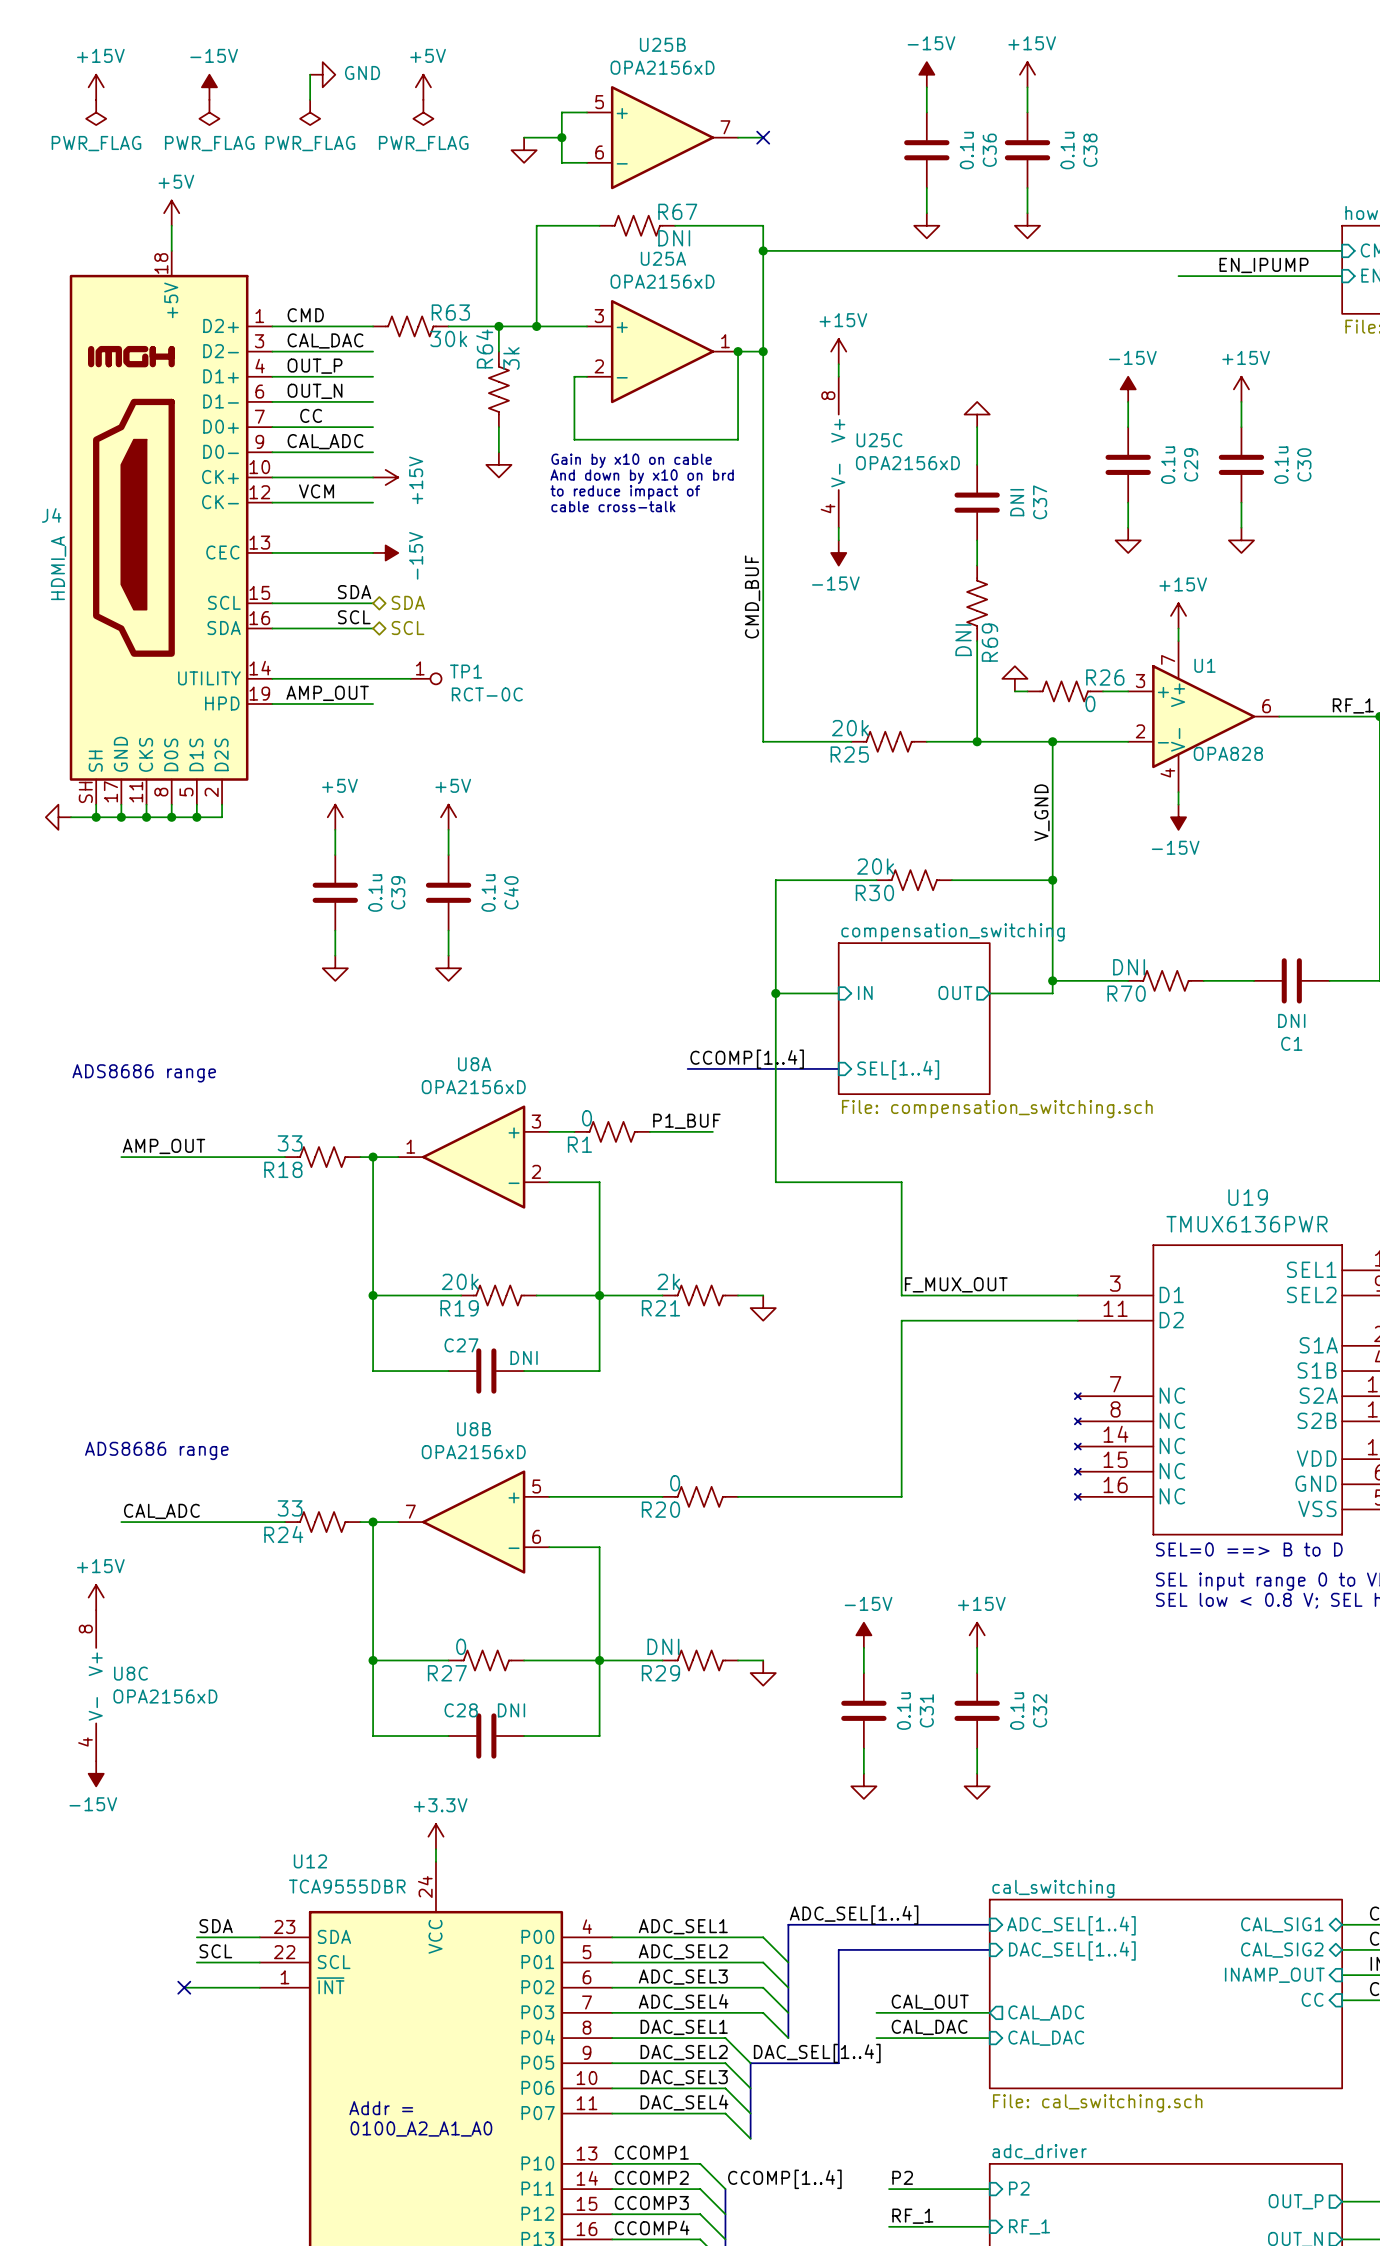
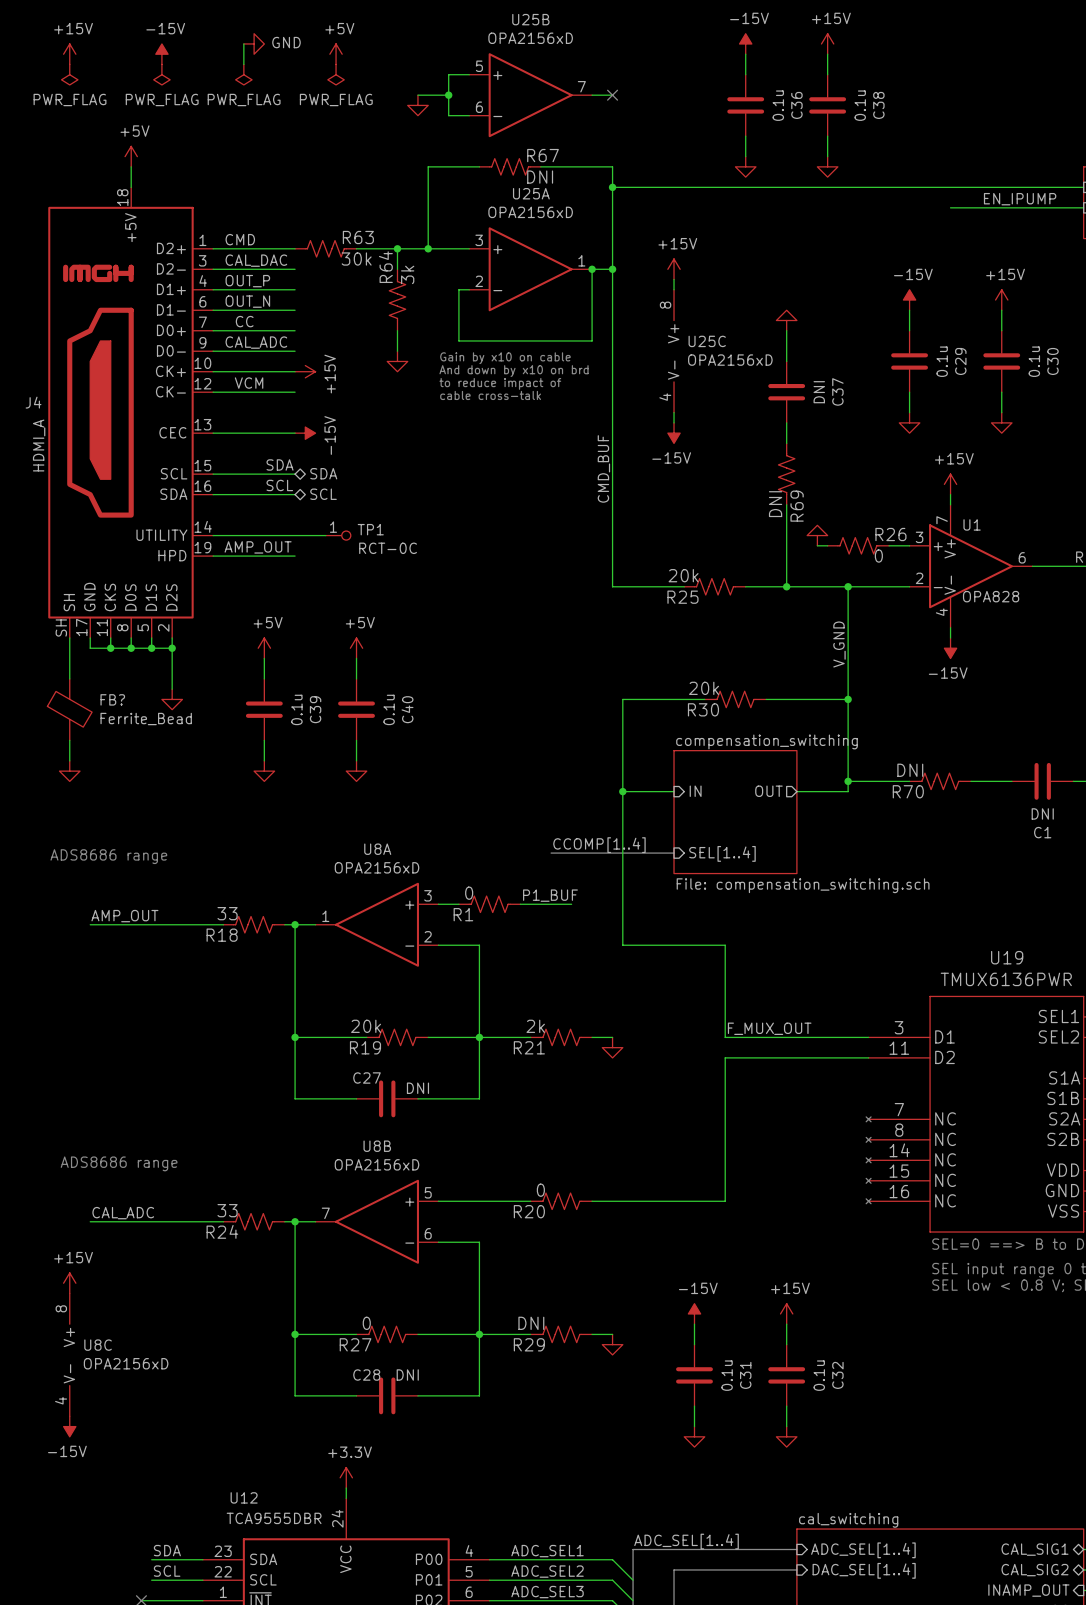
power symbol: (58, 817) -> none
wire: (71, 817) (121, 817) -> none
wire: none -> (69, 648) (69, 678)
junction: (96, 817) -> none
junction: (121, 817) -> none
wire: none -> (172, 648) (172, 689)
junction: none -> (172, 648)
power symbol: none -> (172, 699)
FB?: none -> Ferrite_Bead (69, 709)
wire: none -> (69, 740) (69, 760)
power symbol: none -> (69, 771)

